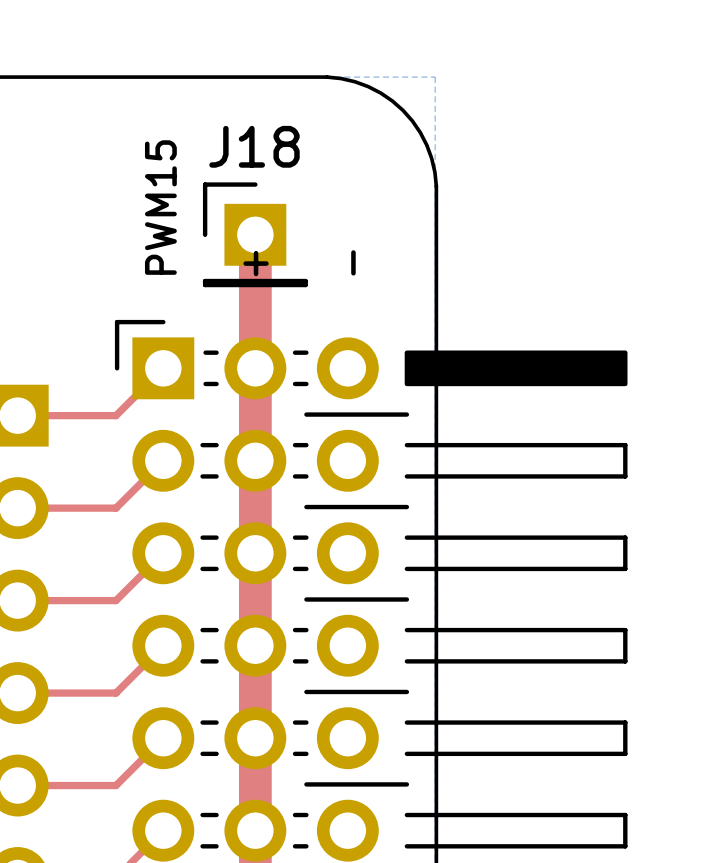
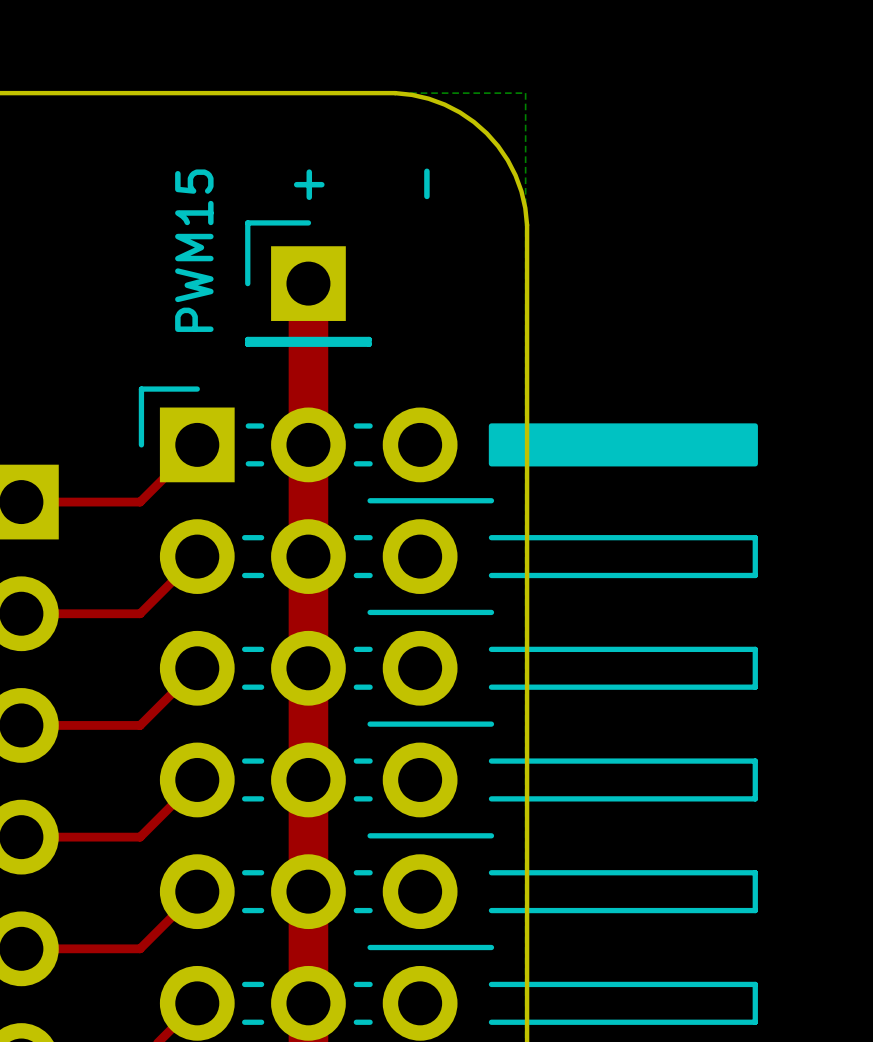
J18 name: J18 (254, 146) -> none
text position: - (353, 262) -> - (426, 183)
text position: + (256, 263) -> + (309, 184)

